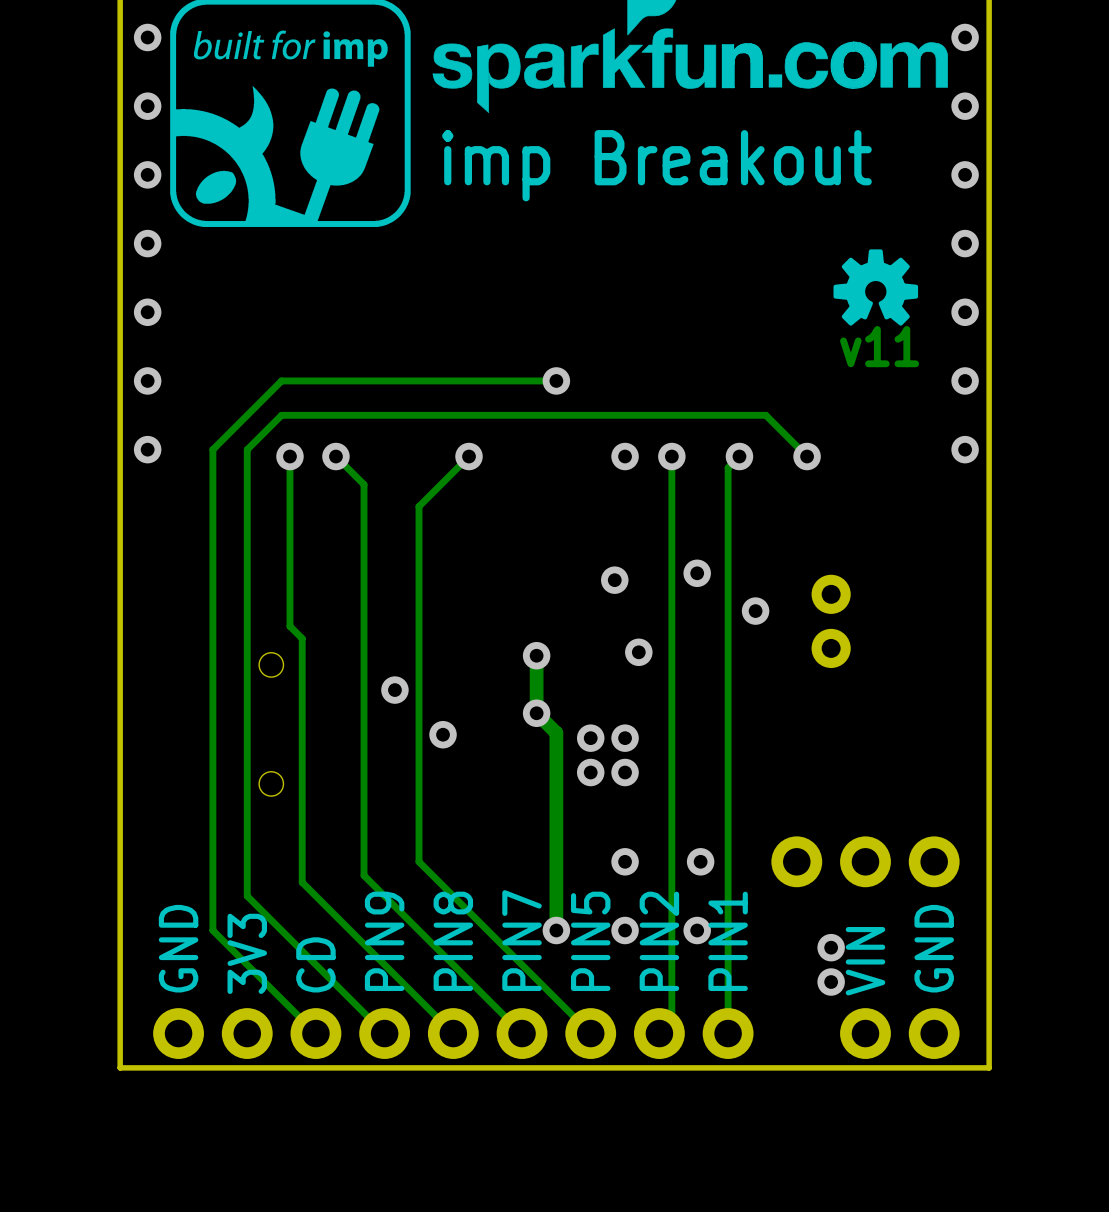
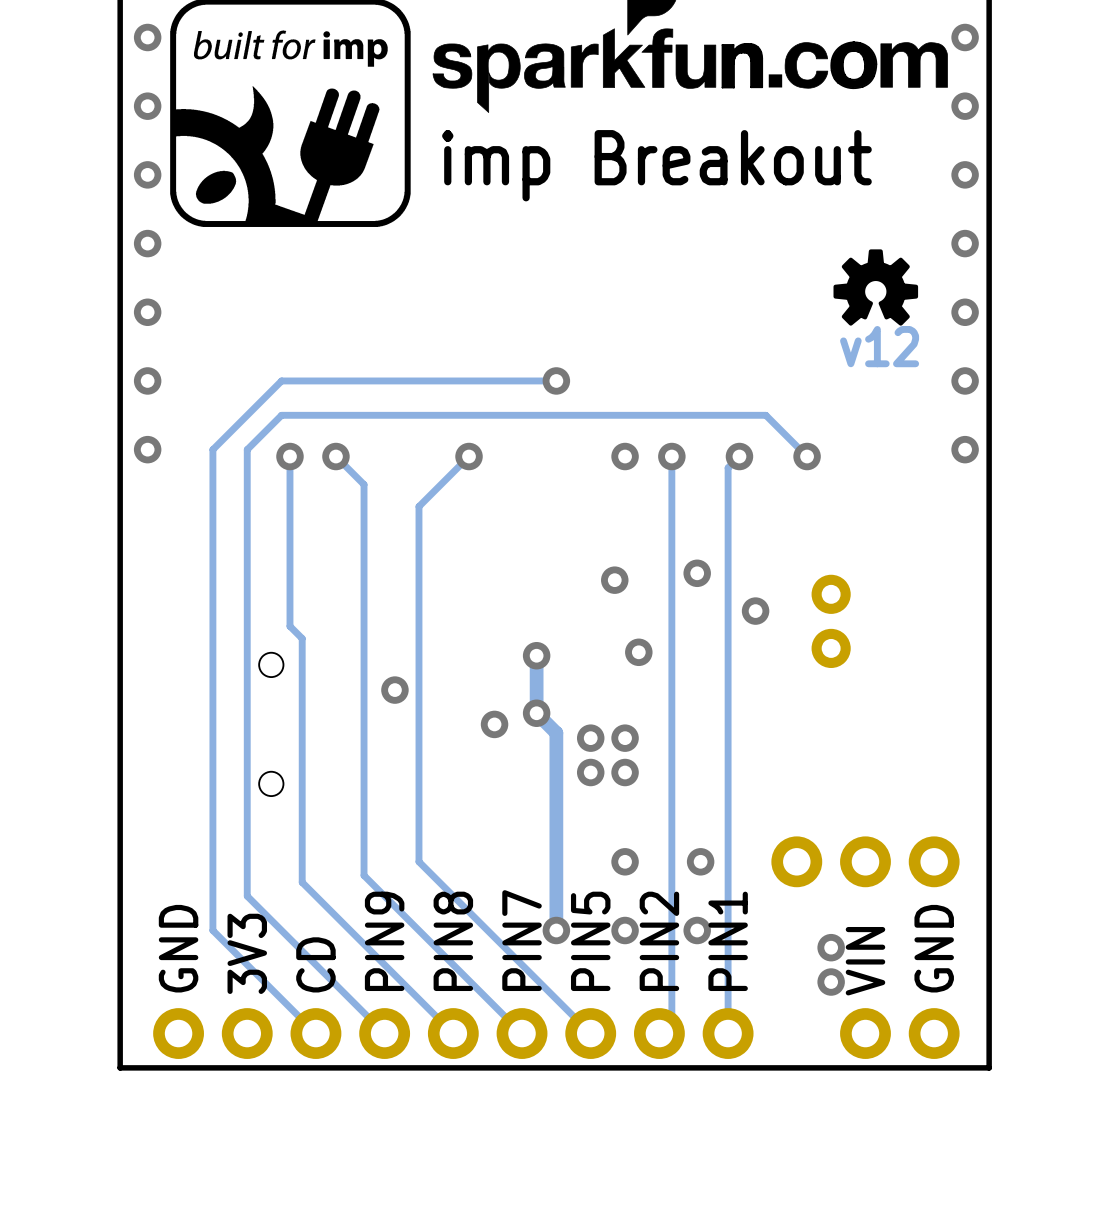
text: v11 (879, 346) -> v12 (879, 346)
via position: (443, 734) -> (494, 724)

